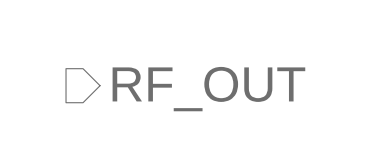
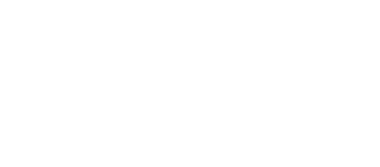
hierarchical label: RF_OUT (208, 89) -> none

